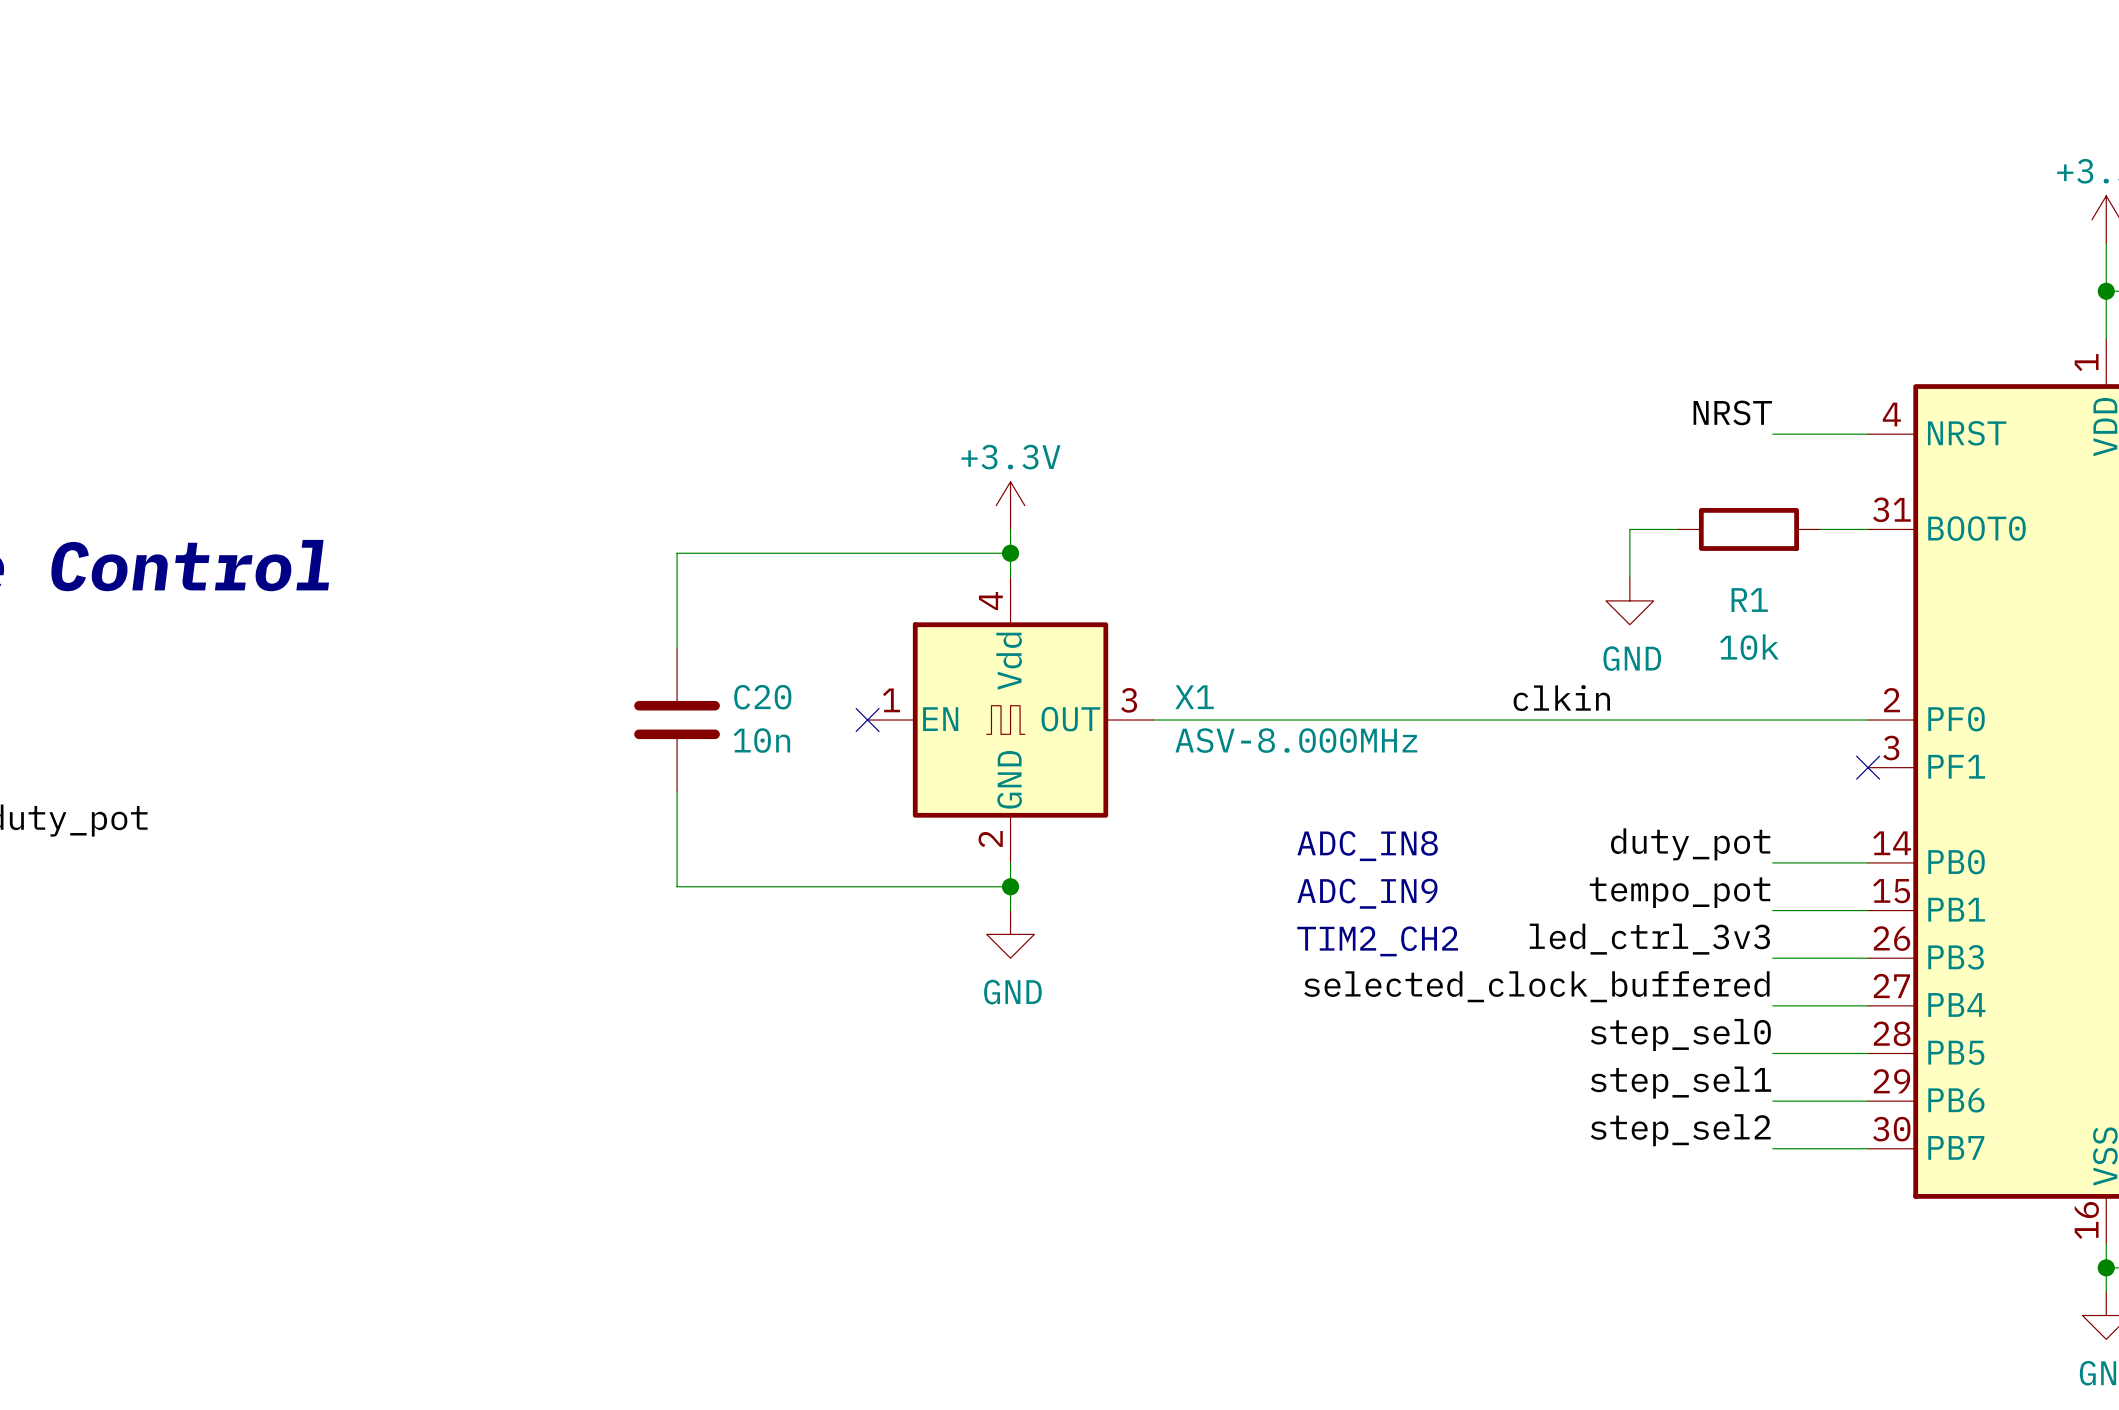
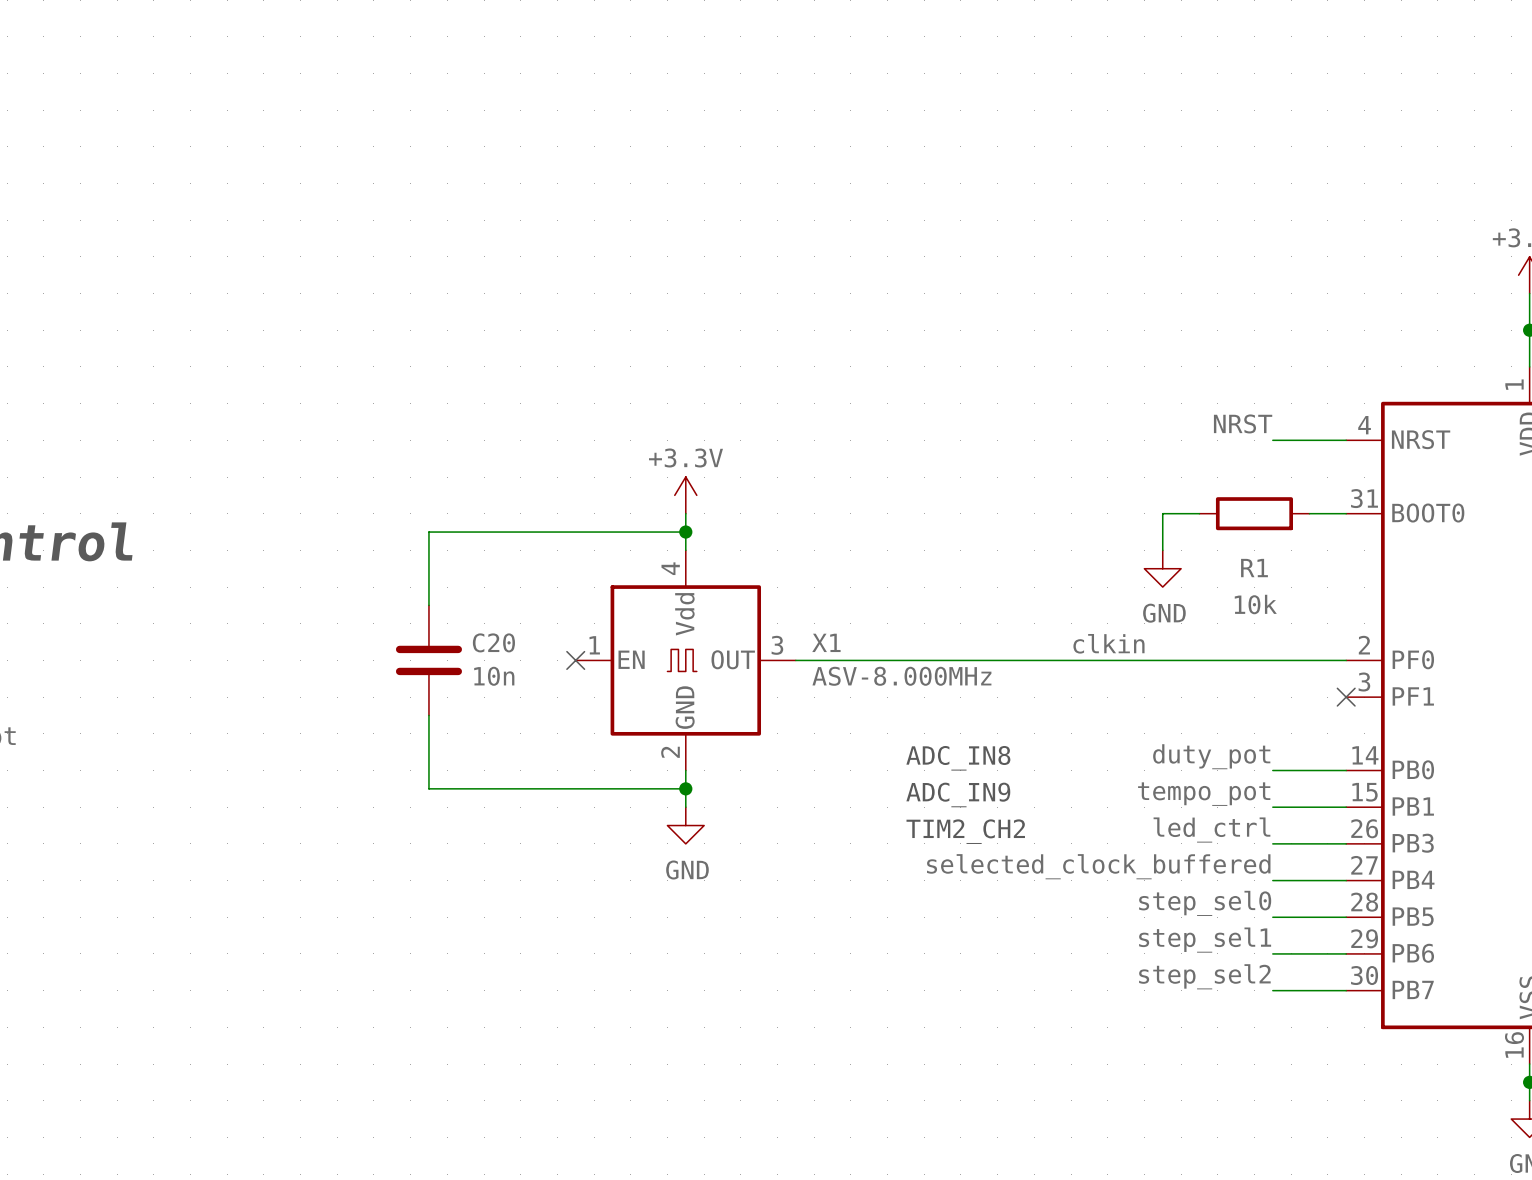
label: led_ctrl_3v3 (1649, 939) -> led_ctrl (1211, 830)

